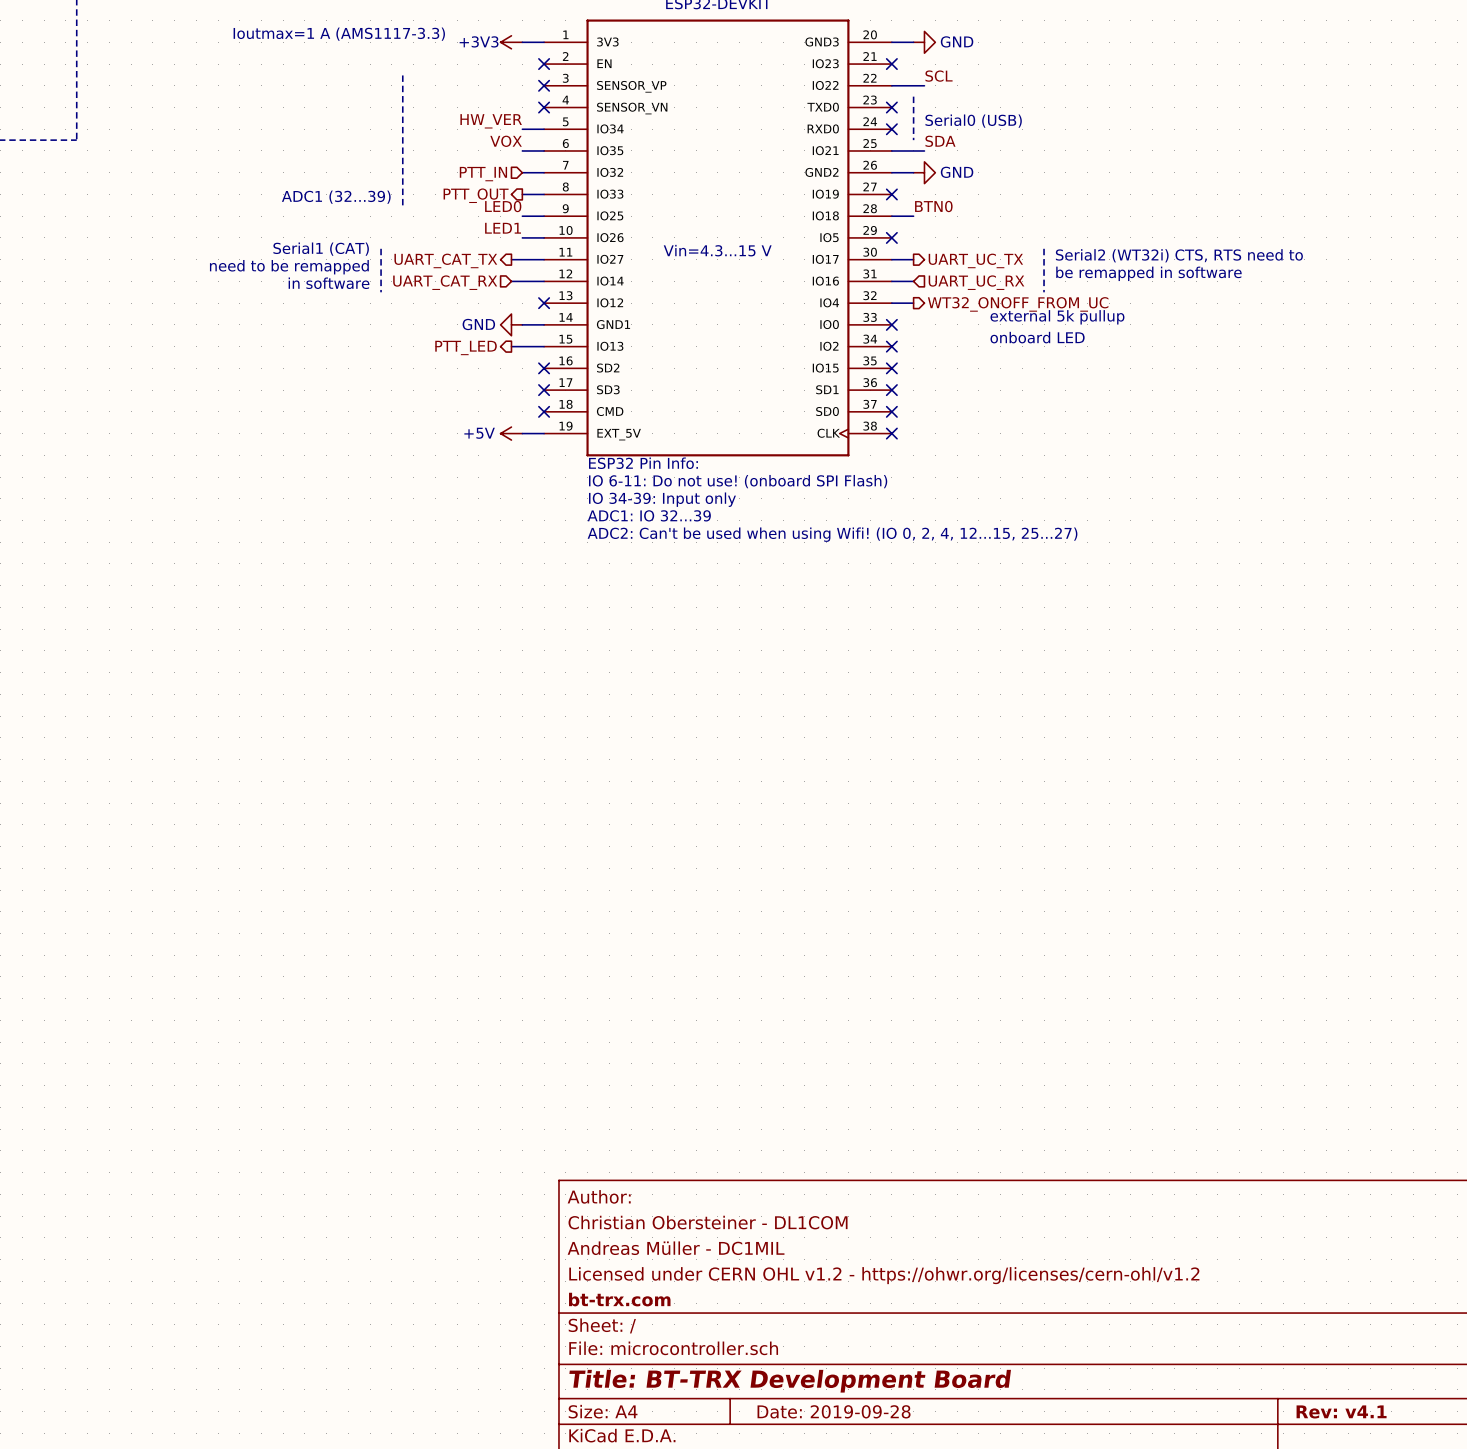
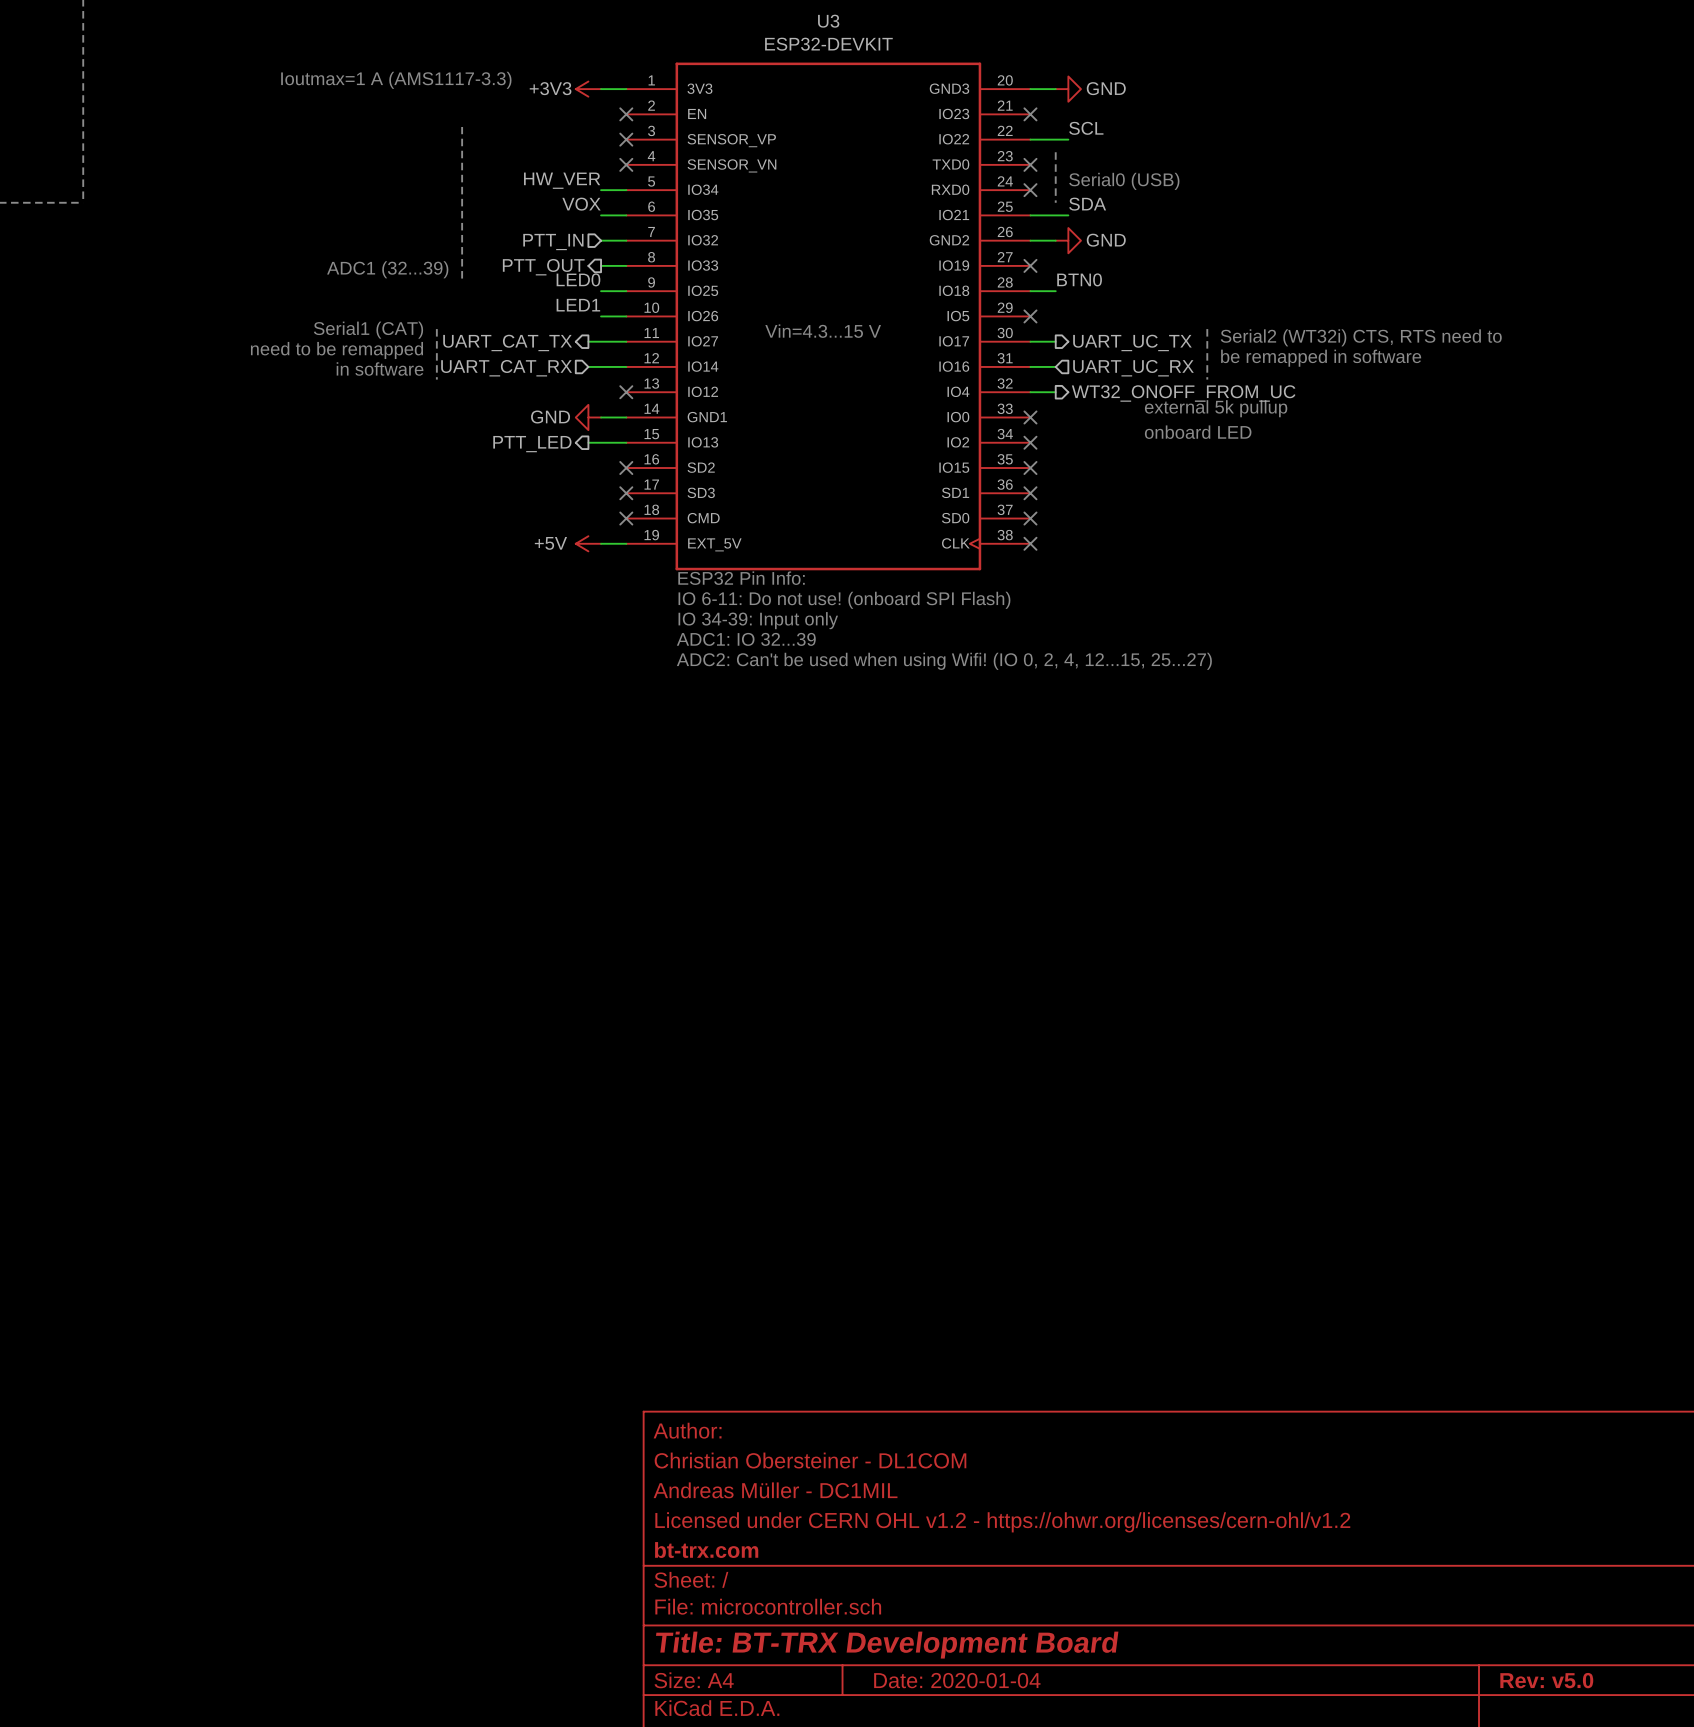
title block: Date: 2019-09-28 (834, 1411) -> Date: 2020-01-04 (957, 1680)
title block: Rev: v4.1 (1341, 1411) -> Rev: v5.0 (1546, 1680)

